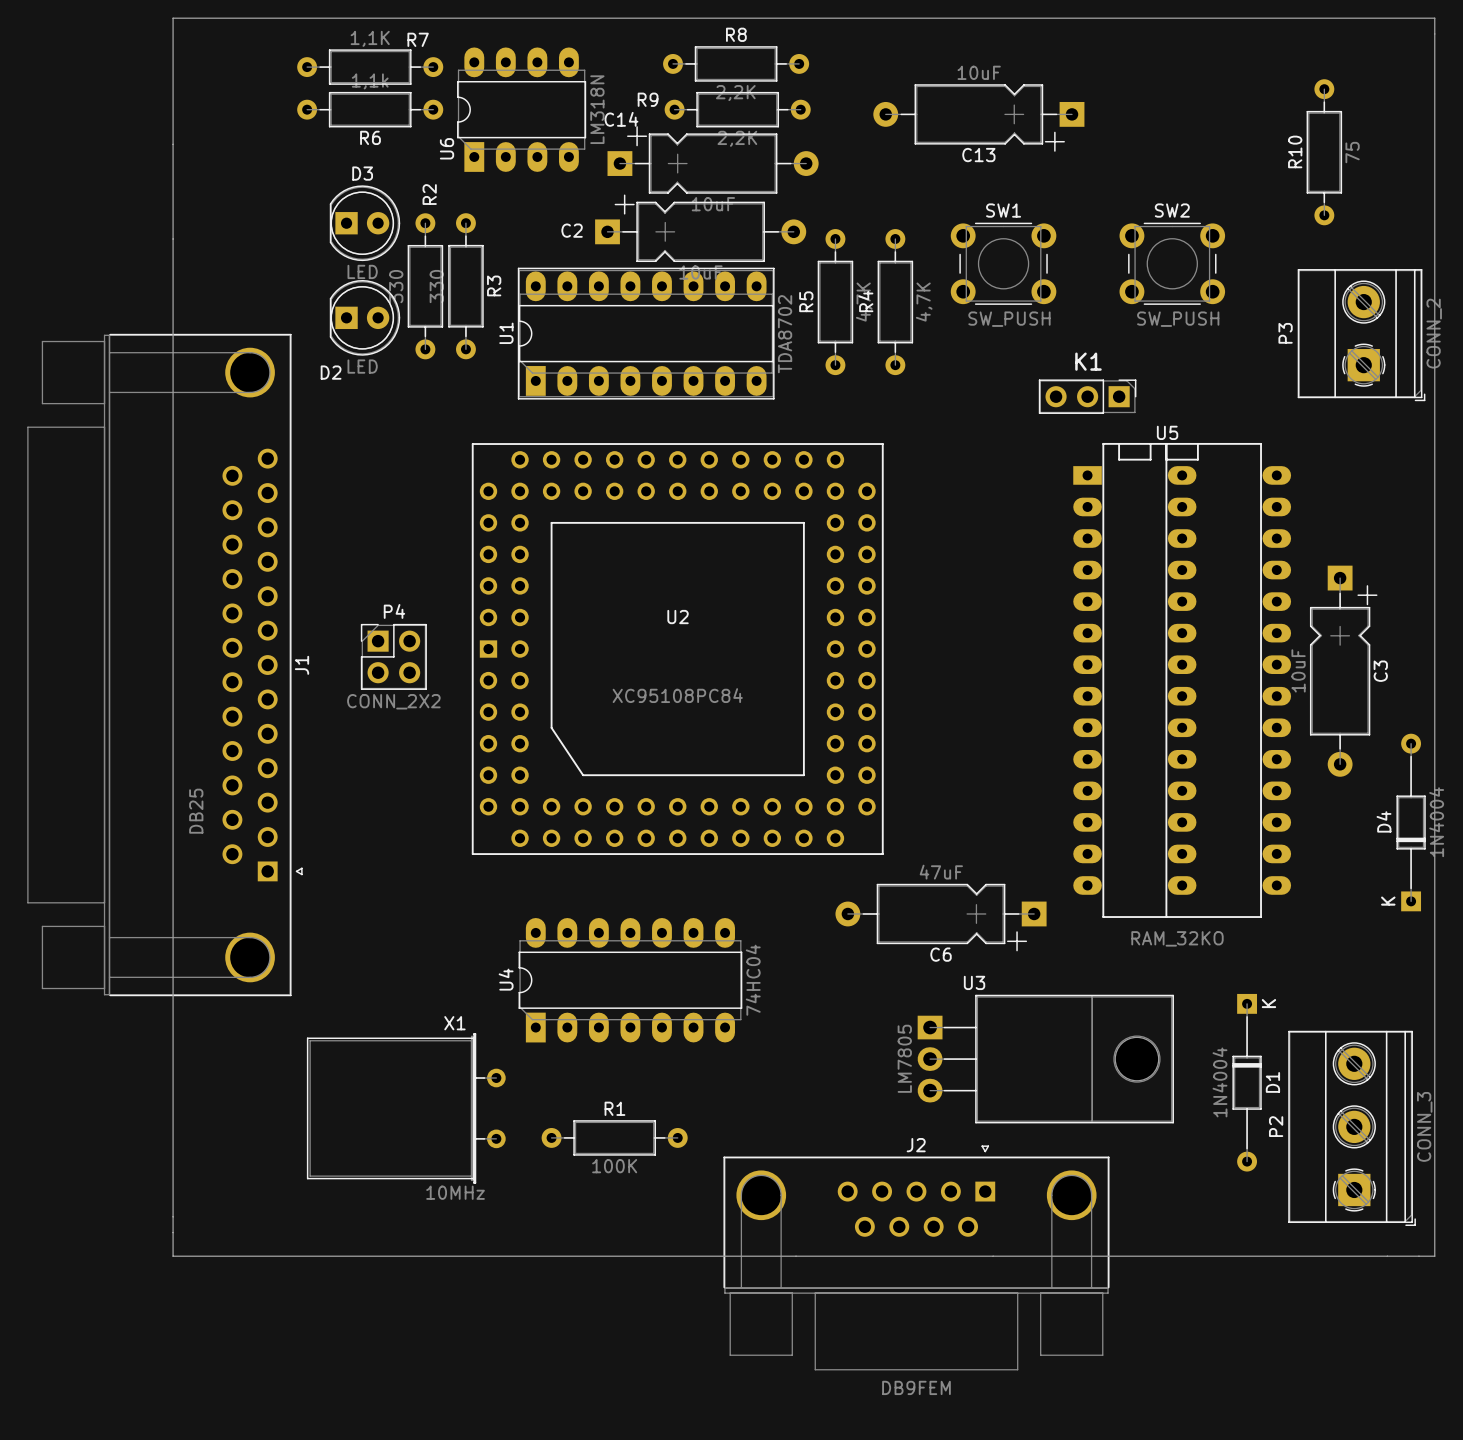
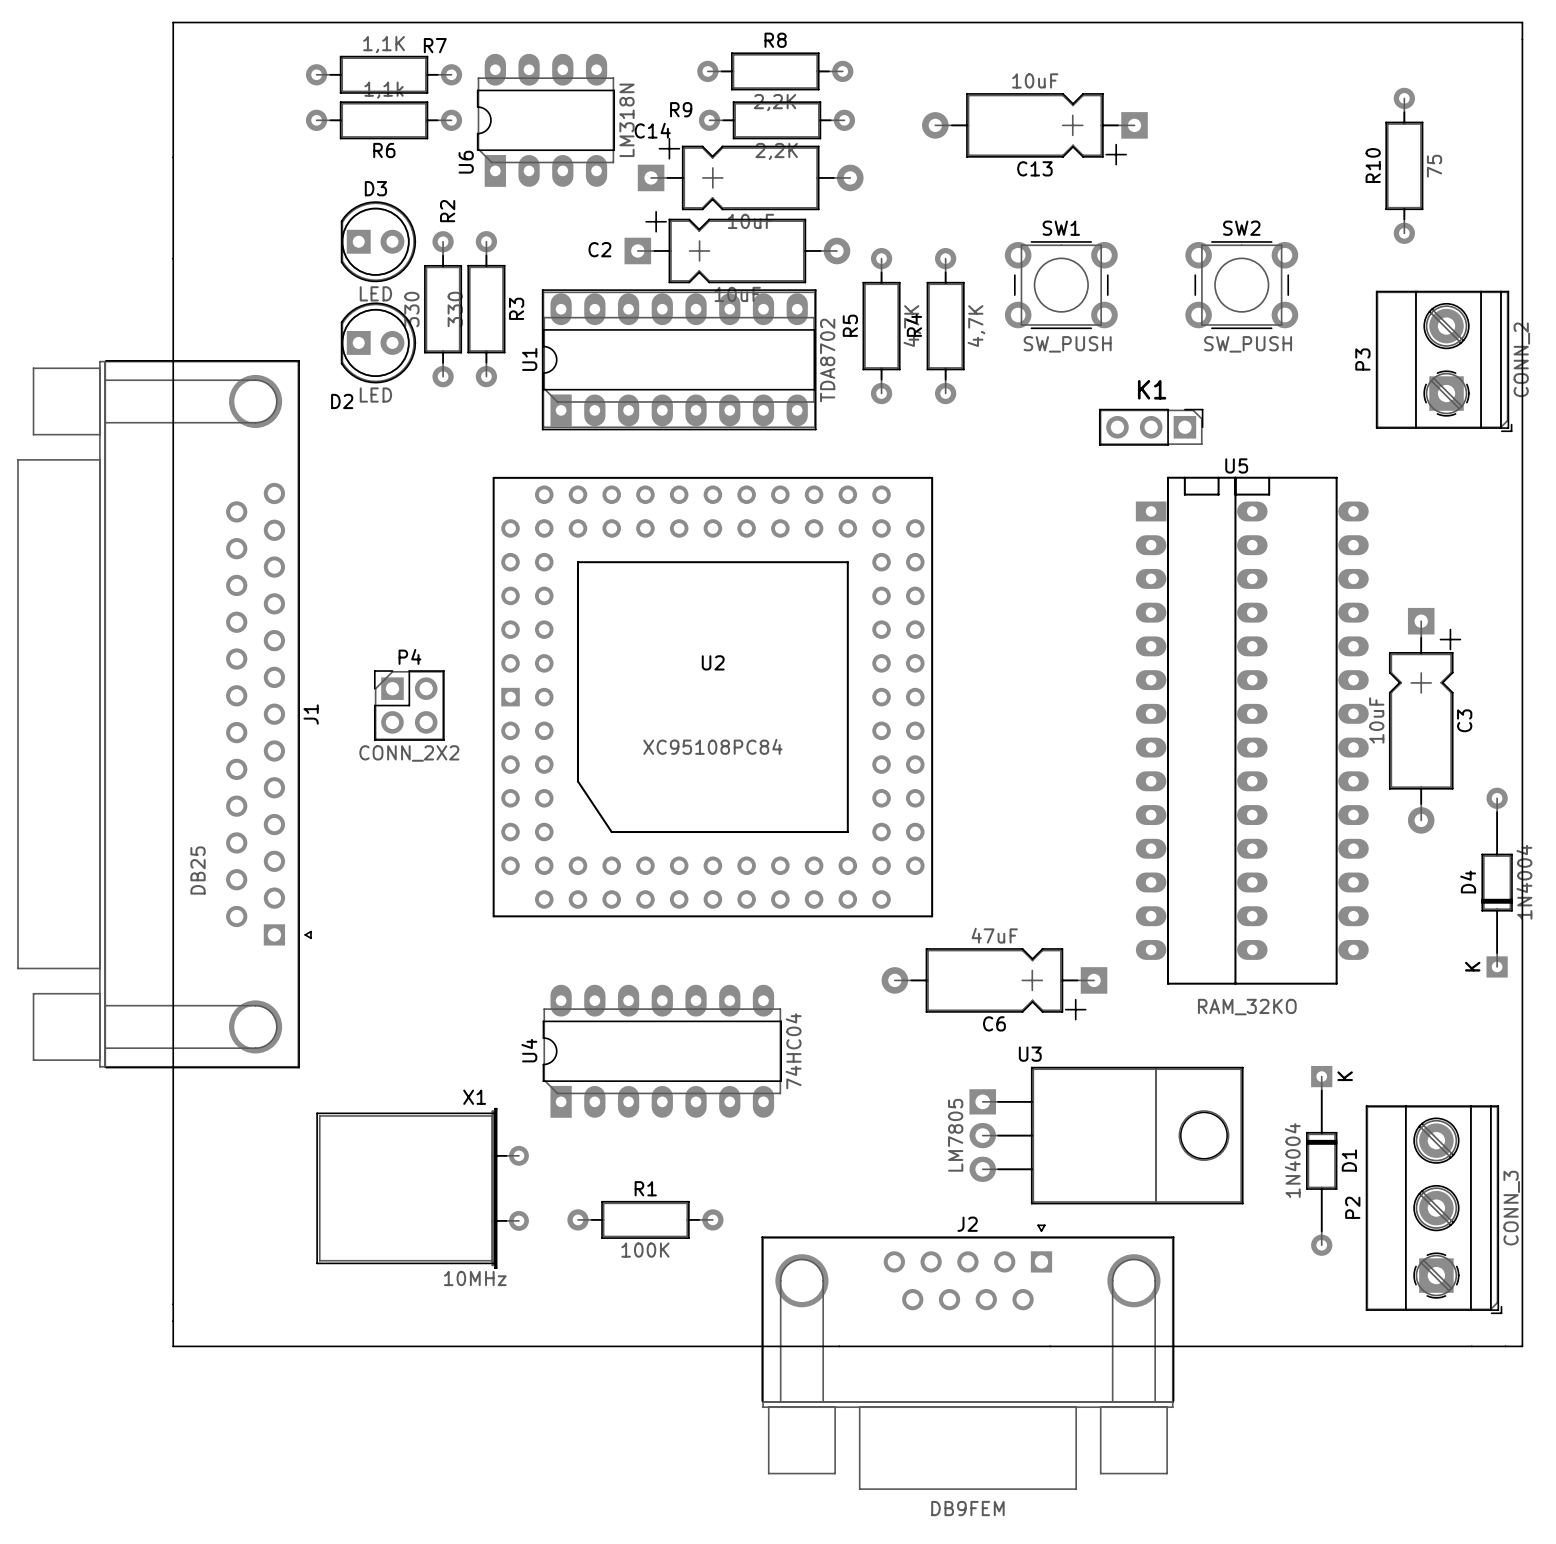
J2 footprint: [723, 1145, 1110, 1371] -> [761, 1224, 1175, 1490]

